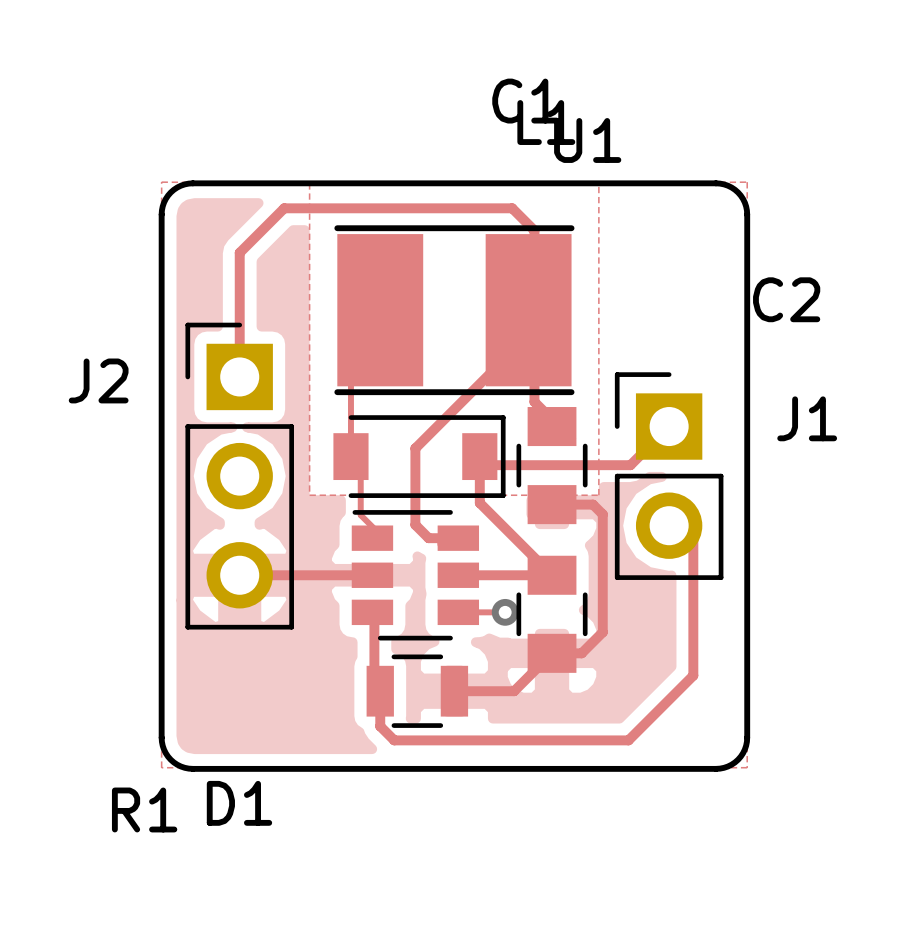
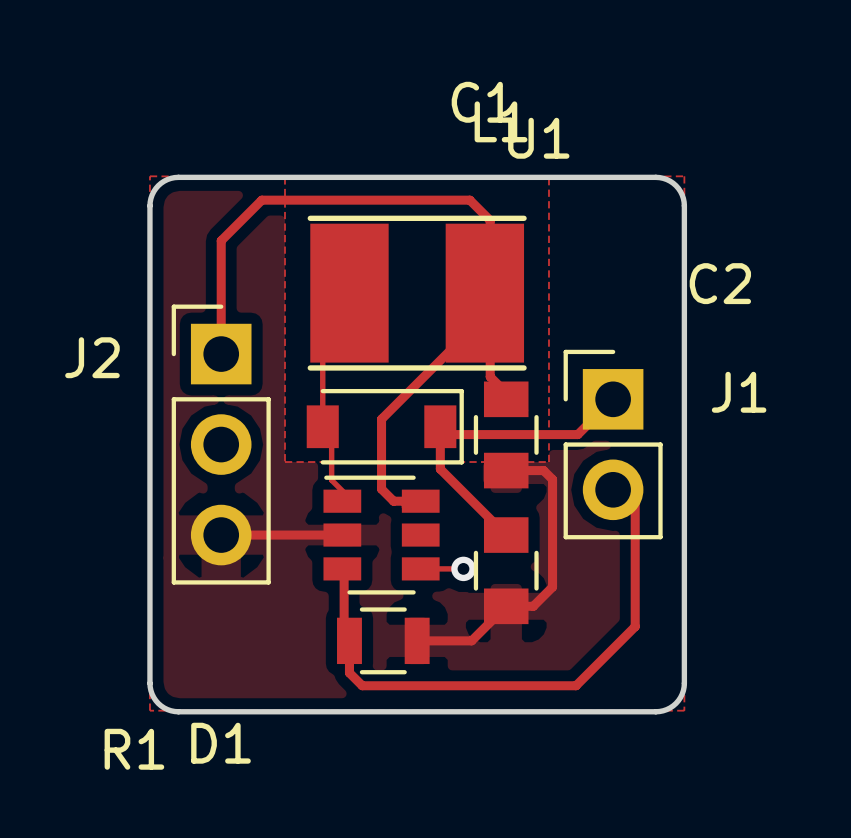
track: (458, 575) (552, 575) -> none

